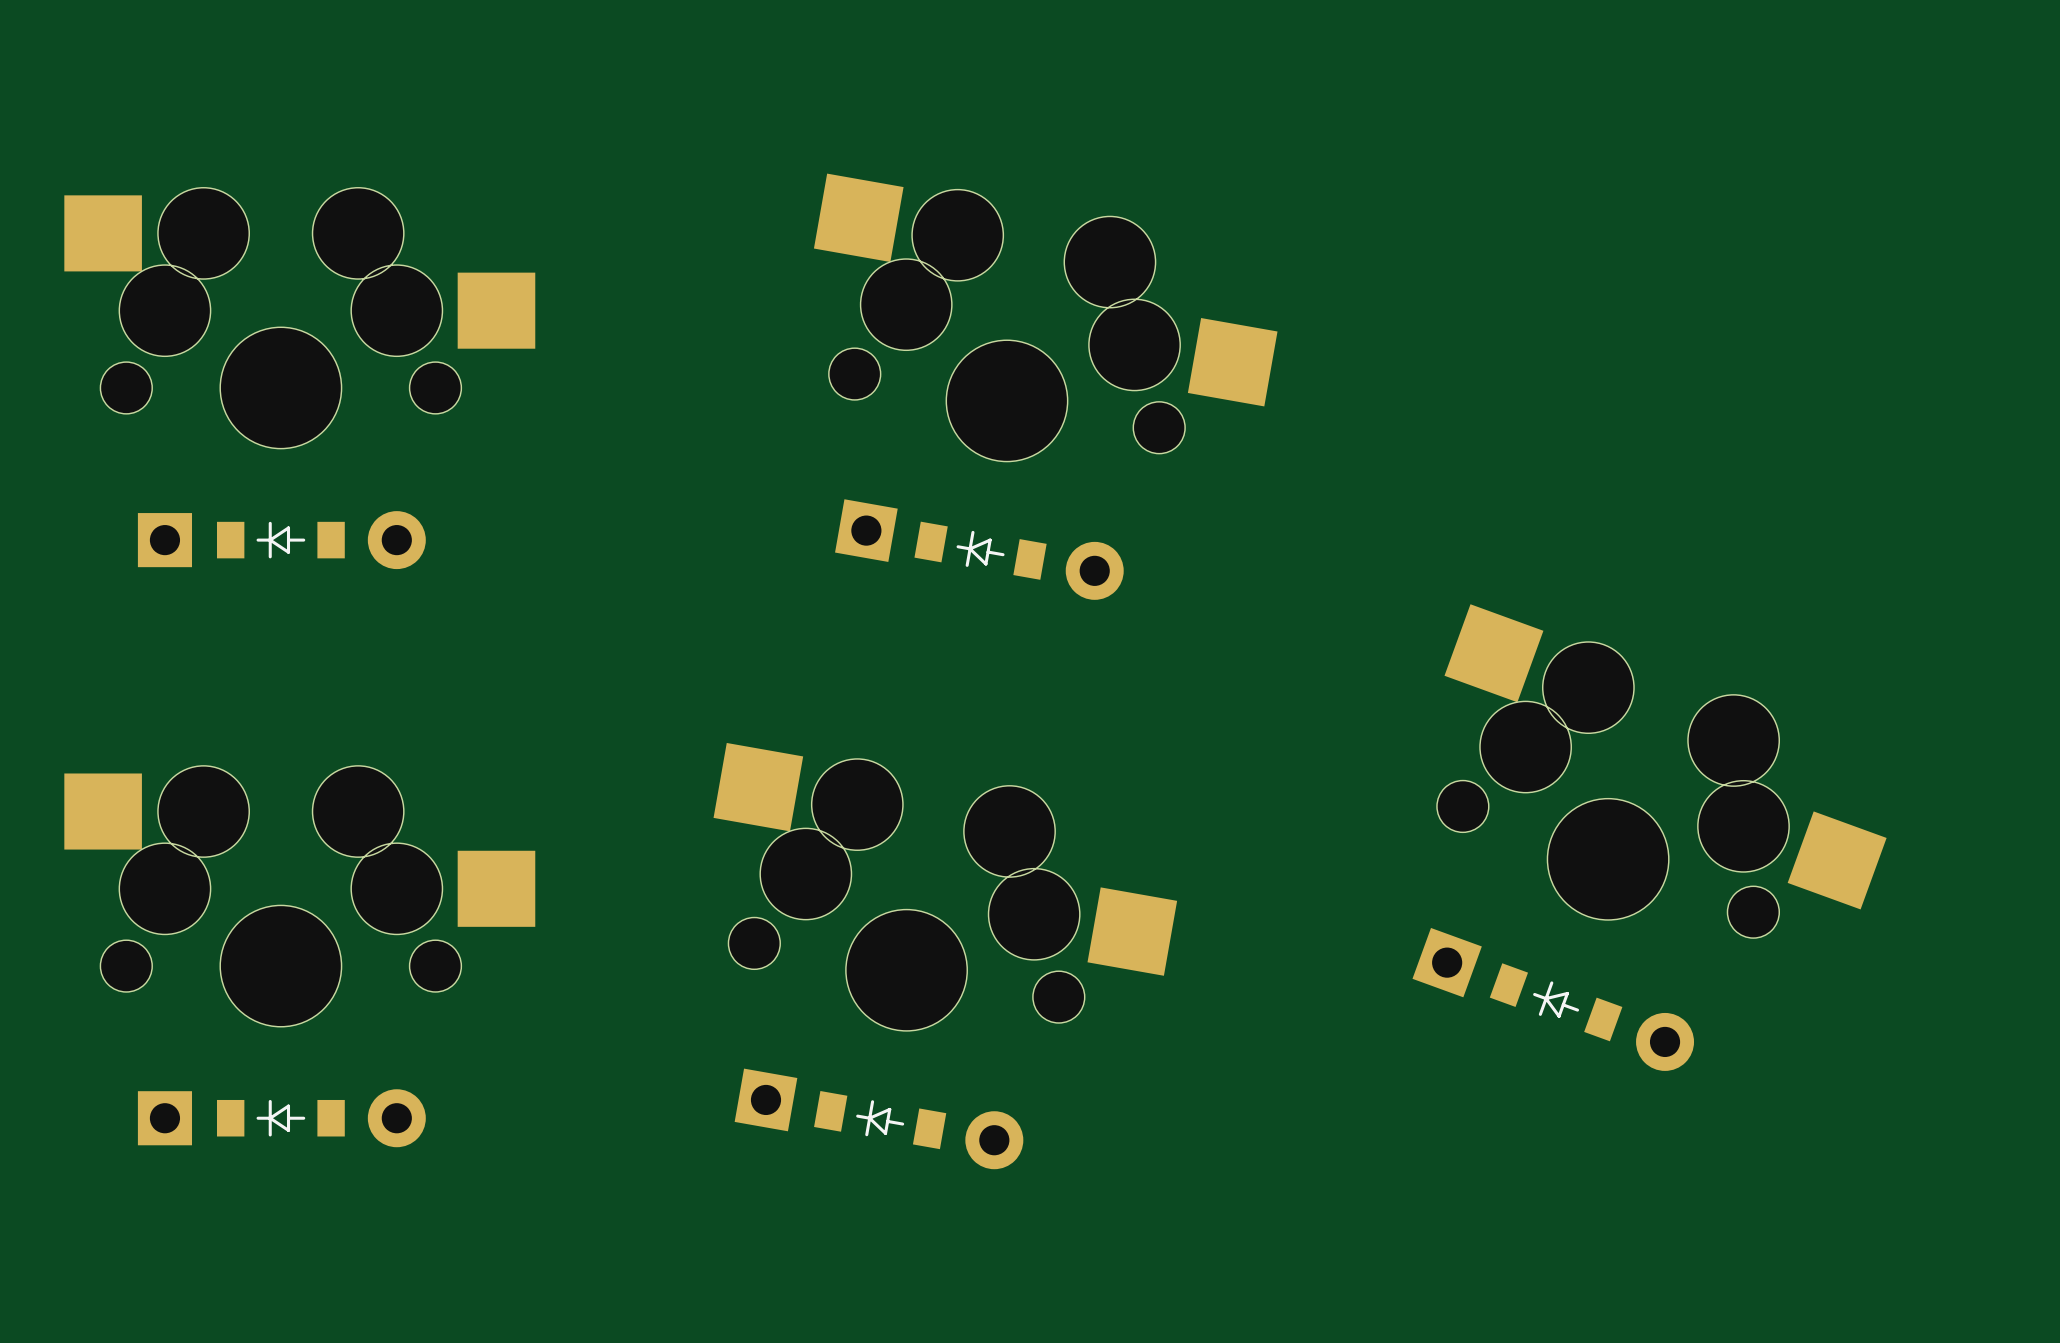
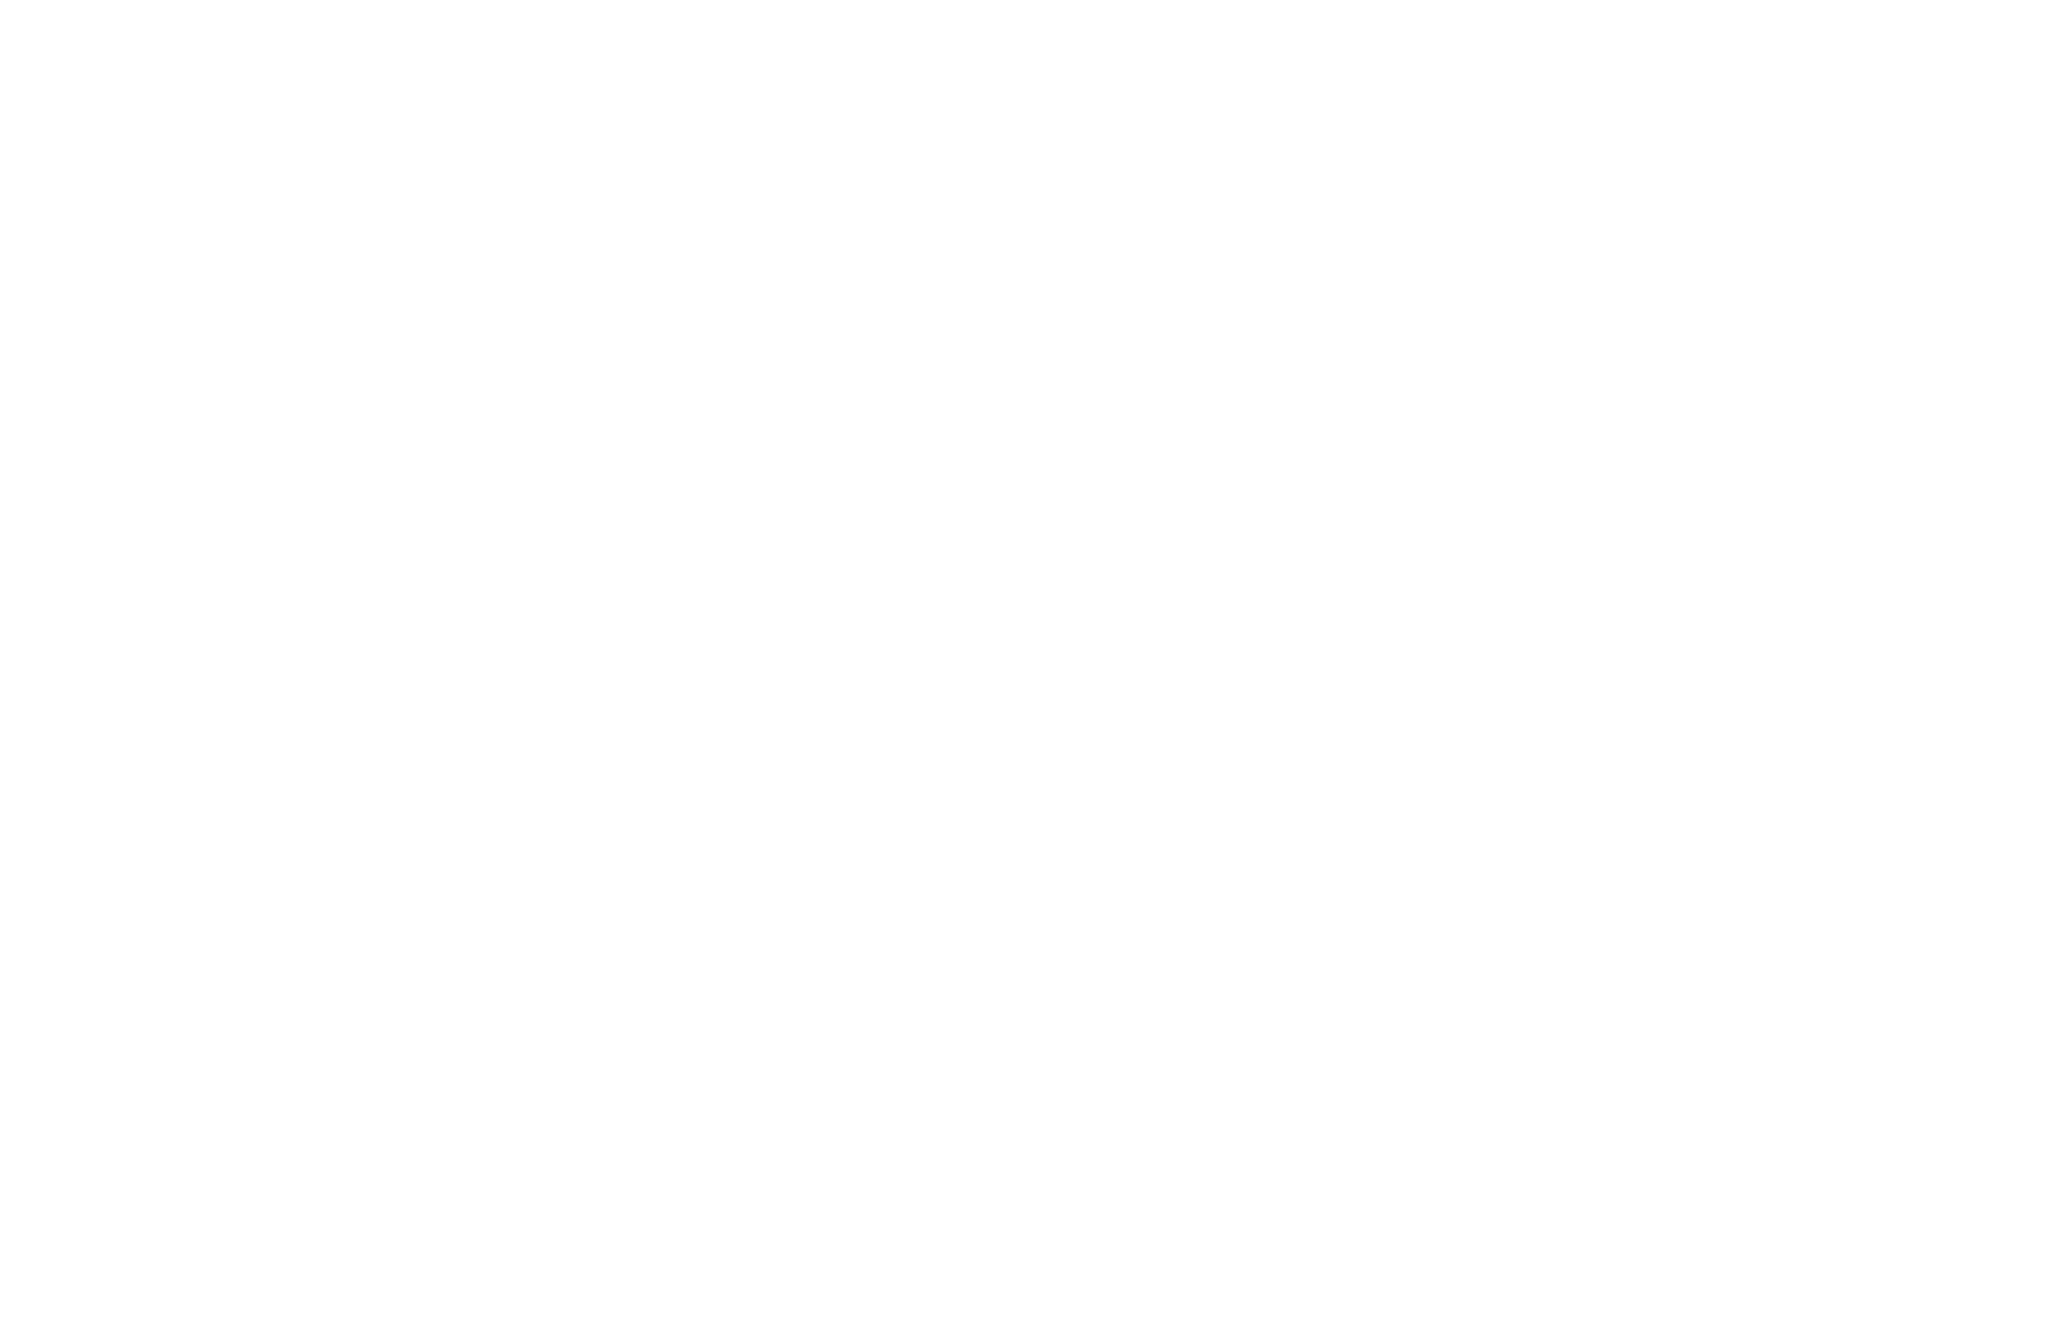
part: (1045, 317) -> none
part: (299, 318) -> none
part: (281, 540) -> none
part: (979, 549) -> none
part: (1661, 771) -> none
part: (945, 886) -> none
part: (299, 896) -> none
part: (1553, 999) -> none
part: (281, 1118) -> none
part: (878, 1118) -> none

